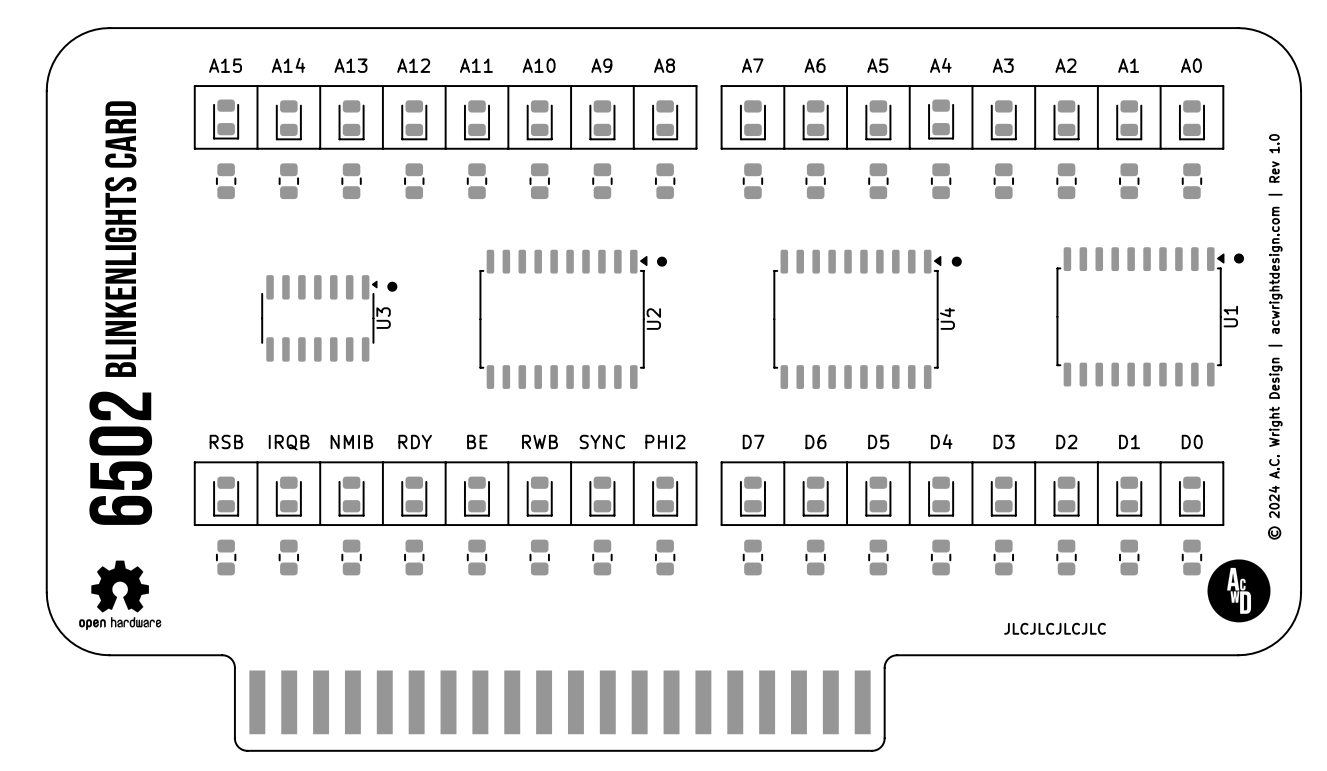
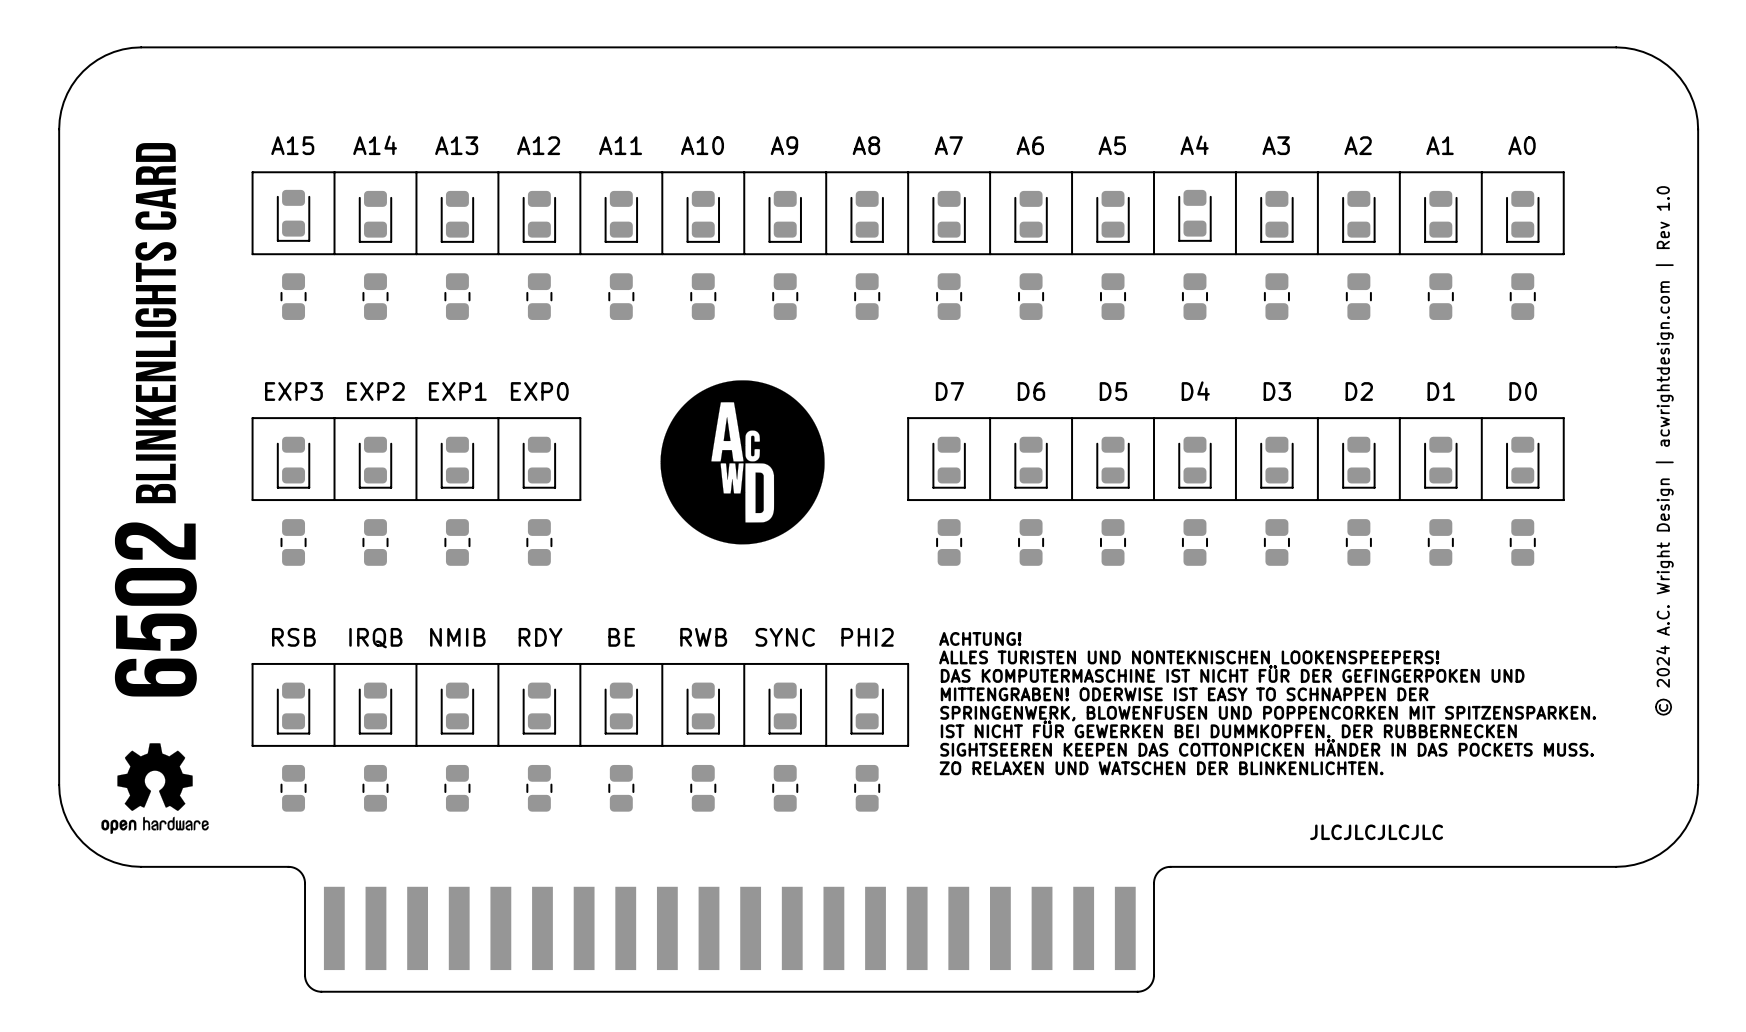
text position: A15 (225, 65) -> A15 (292, 145)
text position: A14 (288, 65) -> A14 (375, 145)
text position: A13 (350, 65) -> A13 (456, 145)
text position: A12 (413, 65) -> A12 (538, 145)
text position: A11 (476, 65) -> A11 (620, 145)
text position: A10 (539, 65) -> A10 (702, 145)
text position: A9 (601, 65) -> A9 (784, 145)
text position: A8 (664, 65) -> A8 (866, 145)
text position: A7 (752, 65) -> A7 (948, 145)
text position: A6 (815, 65) -> A6 (1030, 145)
text position: A5 (877, 65) -> A5 (1112, 145)
text position: A4 (940, 65) -> A4 (1194, 145)
text position: A3 (1003, 65) -> A3 (1276, 145)
text position: A2 (1065, 65) -> A2 (1358, 145)
text position: A1 (1128, 65) -> A1 (1440, 145)
text position: A0 (1191, 65) -> A0 (1521, 145)
line: (257, 86) (257, 123) -> (334, 205) (334, 254)
line: (320, 86) (320, 123) -> (416, 205) (416, 254)
line: (382, 86) (382, 123) -> (498, 205) (498, 254)
line: (445, 86) (445, 123) -> (580, 205) (580, 254)
line: (508, 86) (508, 123) -> (662, 205) (662, 254)
line: (571, 86) (571, 123) -> (744, 205) (744, 254)
line: (633, 86) (633, 123) -> (826, 205) (826, 254)
line: (721, 86) (1223, 86) (1223, 148) (721, 148) (721, 86) -> none
line: (784, 86) (784, 148) -> (990, 172) (990, 254)
line: (847, 86) (847, 148) -> (1072, 172) (1072, 254)
line: (909, 86) (909, 148) -> (1154, 172) (1154, 254)
line: (972, 86) (972, 148) -> (1235, 172) (1235, 254)
line: (1035, 86) (1035, 148) -> (1317, 172) (1317, 254)
line: (1097, 86) (1097, 148) -> (1399, 172) (1399, 254)
line: (1160, 86) (1160, 148) -> (1481, 172) (1481, 254)
part: (226, 119) -> none
part: (941, 119) -> none
part: (288, 120) -> none
part: (351, 120) -> none
part: (414, 120) -> none
part: (477, 120) -> none
part: (539, 120) -> none
part: (602, 120) -> none
part: (665, 120) -> none
part: (752, 120) -> none
part: (815, 120) -> none
part: (878, 120) -> none
part: (1003, 120) -> none
part: (1066, 120) -> none
part: (1129, 120) -> none
part: (1191, 120) -> none
line: (194, 123) (194, 86) (696, 86) (696, 123) -> (252, 172) (1563, 172) (1563, 254) (252, 254) (252, 205)
line: (194, 148) (696, 148) -> (908, 254) (908, 205)
part: none -> (293, 215)
part: none -> (375, 216)
part: none -> (457, 216)
part: none -> (539, 216)
part: none -> (621, 216)
part: none -> (703, 216)
part: none -> (785, 216)
part: none -> (867, 216)
part: none -> (949, 216)
part: none -> (1031, 216)
part: none -> (1113, 216)
part: none -> (1194, 215)
part: none -> (1276, 216)
part: none -> (1358, 216)
part: none -> (1440, 216)
part: none -> (1522, 216)
part: (226, 181) -> none
part: (288, 181) -> none
part: (351, 181) -> none
part: (414, 181) -> none
part: (477, 181) -> none
part: (539, 181) -> none
part: (602, 181) -> none
part: (665, 181) -> none
part: (752, 181) -> none
part: (815, 181) -> none
part: (878, 181) -> none
part: (941, 181) -> none
part: (1003, 181) -> none
part: (1066, 181) -> none
part: (1129, 181) -> none
part: (1191, 181) -> none
part: none -> (293, 296)
part: none -> (375, 296)
part: none -> (457, 296)
part: none -> (539, 296)
part: none -> (621, 296)
part: none -> (703, 296)
part: none -> (785, 296)
part: none -> (867, 296)
part: none -> (949, 296)
part: none -> (1031, 296)
part: none -> (1113, 296)
part: none -> (1194, 296)
part: none -> (1276, 296)
part: none -> (1358, 296)
part: none -> (1440, 296)
part: none -> (1522, 296)
drawing: [1233, 253, 1245, 264] -> none
drawing: [656, 256, 668, 267] -> none
drawing: [951, 256, 962, 267] -> none
drawing: [387, 281, 398, 292] -> none
drawing: none -> [660, 380, 825, 545]
text: none -> EXP3 (293, 391)
text: none -> EXP2 (375, 391)
text: none -> EXP1 (457, 391)
text: none -> EXP0 (539, 391)
line: none -> (252, 418) (252, 500) (580, 500) (580, 418) (252, 418)
line: none -> (334, 418) (334, 500)
line: none -> (416, 418) (416, 500)
line: none -> (498, 418) (498, 500)
U1: (1140, 316) -> none
U3: (319, 318) -> none
U2: (563, 319) -> none
U4: (857, 319) -> none
part: none -> (293, 462)
part: none -> (375, 462)
part: none -> (457, 462)
part: none -> (539, 462)
part: none -> (949, 462)
part: none -> (1031, 462)
part: none -> (1113, 462)
part: none -> (1194, 462)
part: none -> (1276, 462)
part: none -> (1358, 462)
part: none -> (1440, 462)
part: none -> (1522, 462)
part: none -> (293, 542)
part: none -> (375, 542)
part: none -> (457, 542)
part: none -> (539, 542)
part: none -> (949, 542)
part: none -> (1031, 542)
part: none -> (1113, 542)
part: none -> (1194, 542)
part: none -> (1276, 542)
part: none -> (1358, 542)
part: none -> (1440, 542)
part: none -> (1522, 542)
text position: RSB (226, 441) -> RSB (293, 637)
text position: NMIB (351, 441) -> NMIB (457, 637)
text position: RDY (415, 441) -> RDY (540, 637)
text position: BE (477, 441) -> BE (621, 637)
text position: RWB (540, 441) -> RWB (703, 637)
text position: SYNC (602, 441) -> SYNC (785, 637)
text position: PHI2 (665, 441) -> PHI2 (867, 637)
text position: D7 (753, 441) -> D7 (949, 391)
text position: D6 (815, 441) -> D6 (1031, 391)
text position: D5 (878, 441) -> D5 (1113, 391)
text position: D4 (941, 441) -> D4 (1195, 391)
text position: D3 (1004, 441) -> D3 (1277, 391)
text position: D2 (1066, 441) -> D2 (1359, 391)
text position: D1 (1129, 441) -> D1 (1441, 391)
text position: D0 (1192, 441) -> D0 (1523, 391)
text position: IRQB (289, 442) -> IRQB (375, 638)
line: (257, 462) (257, 499) -> (334, 696) (334, 745)
line: (320, 462) (320, 499) -> (416, 696) (416, 745)
line: (382, 462) (382, 499) -> (498, 696) (498, 745)
line: (445, 462) (445, 499) -> (580, 696) (580, 745)
line: (508, 462) (508, 499) -> (662, 696) (662, 745)
line: (571, 462) (571, 499) -> (744, 696) (744, 745)
line: (633, 462) (633, 499) -> (826, 696) (826, 745)
line: (721, 462) (1223, 462) (1223, 525) (721, 525) (721, 462) -> (908, 418) (1563, 418) (1563, 500) (908, 500) (908, 418)
line: (784, 462) (784, 525) -> (990, 418) (990, 500)
line: (847, 462) (847, 525) -> (1072, 418) (1072, 500)
line: (909, 462) (909, 525) -> (1154, 418) (1154, 500)
line: (972, 462) (972, 525) -> (1235, 418) (1235, 500)
line: (1035, 462) (1035, 525) -> (1317, 418) (1317, 500)
line: (1097, 462) (1097, 525) -> (1399, 418) (1399, 500)
line: (1160, 462) (1160, 525) -> (1481, 418) (1481, 500)
text: none -> ACHTUNG! (980, 638)
text: none -> ALLES TURISTEN UND NONTEKNISCHEN LOOKENSPEEPERS! (1189, 657)
part: (226, 496) -> none
part: (288, 496) -> none
part: (351, 496) -> none
part: (414, 496) -> none
part: (477, 496) -> none
part: (539, 496) -> none
part: (602, 496) -> none
part: (665, 496) -> none
part: (752, 496) -> none
part: (815, 496) -> none
part: (878, 496) -> none
part: (941, 496) -> none
part: (1003, 496) -> none
part: (1066, 496) -> none
part: (1129, 496) -> none
part: (1191, 496) -> none
line: (194, 499) (194, 462) (696, 462) (696, 499) -> (252, 663) (908, 663)
text: none -> DAS KOMPUTERMASCHINE IST NICHT FÜR DER GEFINGERPOKEN UND (1232, 673)
text: none -> MITTENGRABEN! ODERWISE IST EASY TO SCHNAPPEN DER (1184, 694)
line: (194, 525) (696, 525) -> (252, 696) (252, 745) (908, 745) (908, 696)
part: none -> (293, 708)
part: none -> (375, 708)
part: none -> (457, 708)
part: none -> (539, 708)
part: none -> (621, 708)
part: none -> (703, 708)
part: none -> (785, 708)
part: none -> (867, 708)
text: none -> SPRINGENWERK, BLOWENFUSEN UND POPPENCORKEN MIT SPITZENSPARKEN. (1268, 713)
text: none -> IST NICHT FÜR GEWERKEN BEI DUMMKOPFEN. DER RUBBERNECKEN (1228, 729)
part: (226, 557) -> none
part: (288, 557) -> none
part: (351, 557) -> none
part: (414, 557) -> none
part: (477, 557) -> none
part: (539, 557) -> none
part: (602, 557) -> none
part: (665, 557) -> none
part: (752, 557) -> none
part: (815, 557) -> none
part: (878, 557) -> none
part: (941, 557) -> none
part: (1003, 557) -> none
part: (1066, 557) -> none
part: (1129, 557) -> none
part: (1191, 557) -> none
drawing: [1207, 559, 1271, 623] -> none
text: none -> SIGHTSEEREN KEEPEN DAS COTTONPICKEN HÄNDER IN DAS POCKETS MUSS. (1267, 747)
text: none -> ZO RELAXEN UND WATSCHEN DER BLINKENLICHTEN. (1161, 768)
part: none -> (293, 788)
part: none -> (375, 788)
part: none -> (457, 788)
part: none -> (539, 788)
part: none -> (621, 788)
part: none -> (703, 788)
part: none -> (785, 788)
part: none -> (867, 788)

